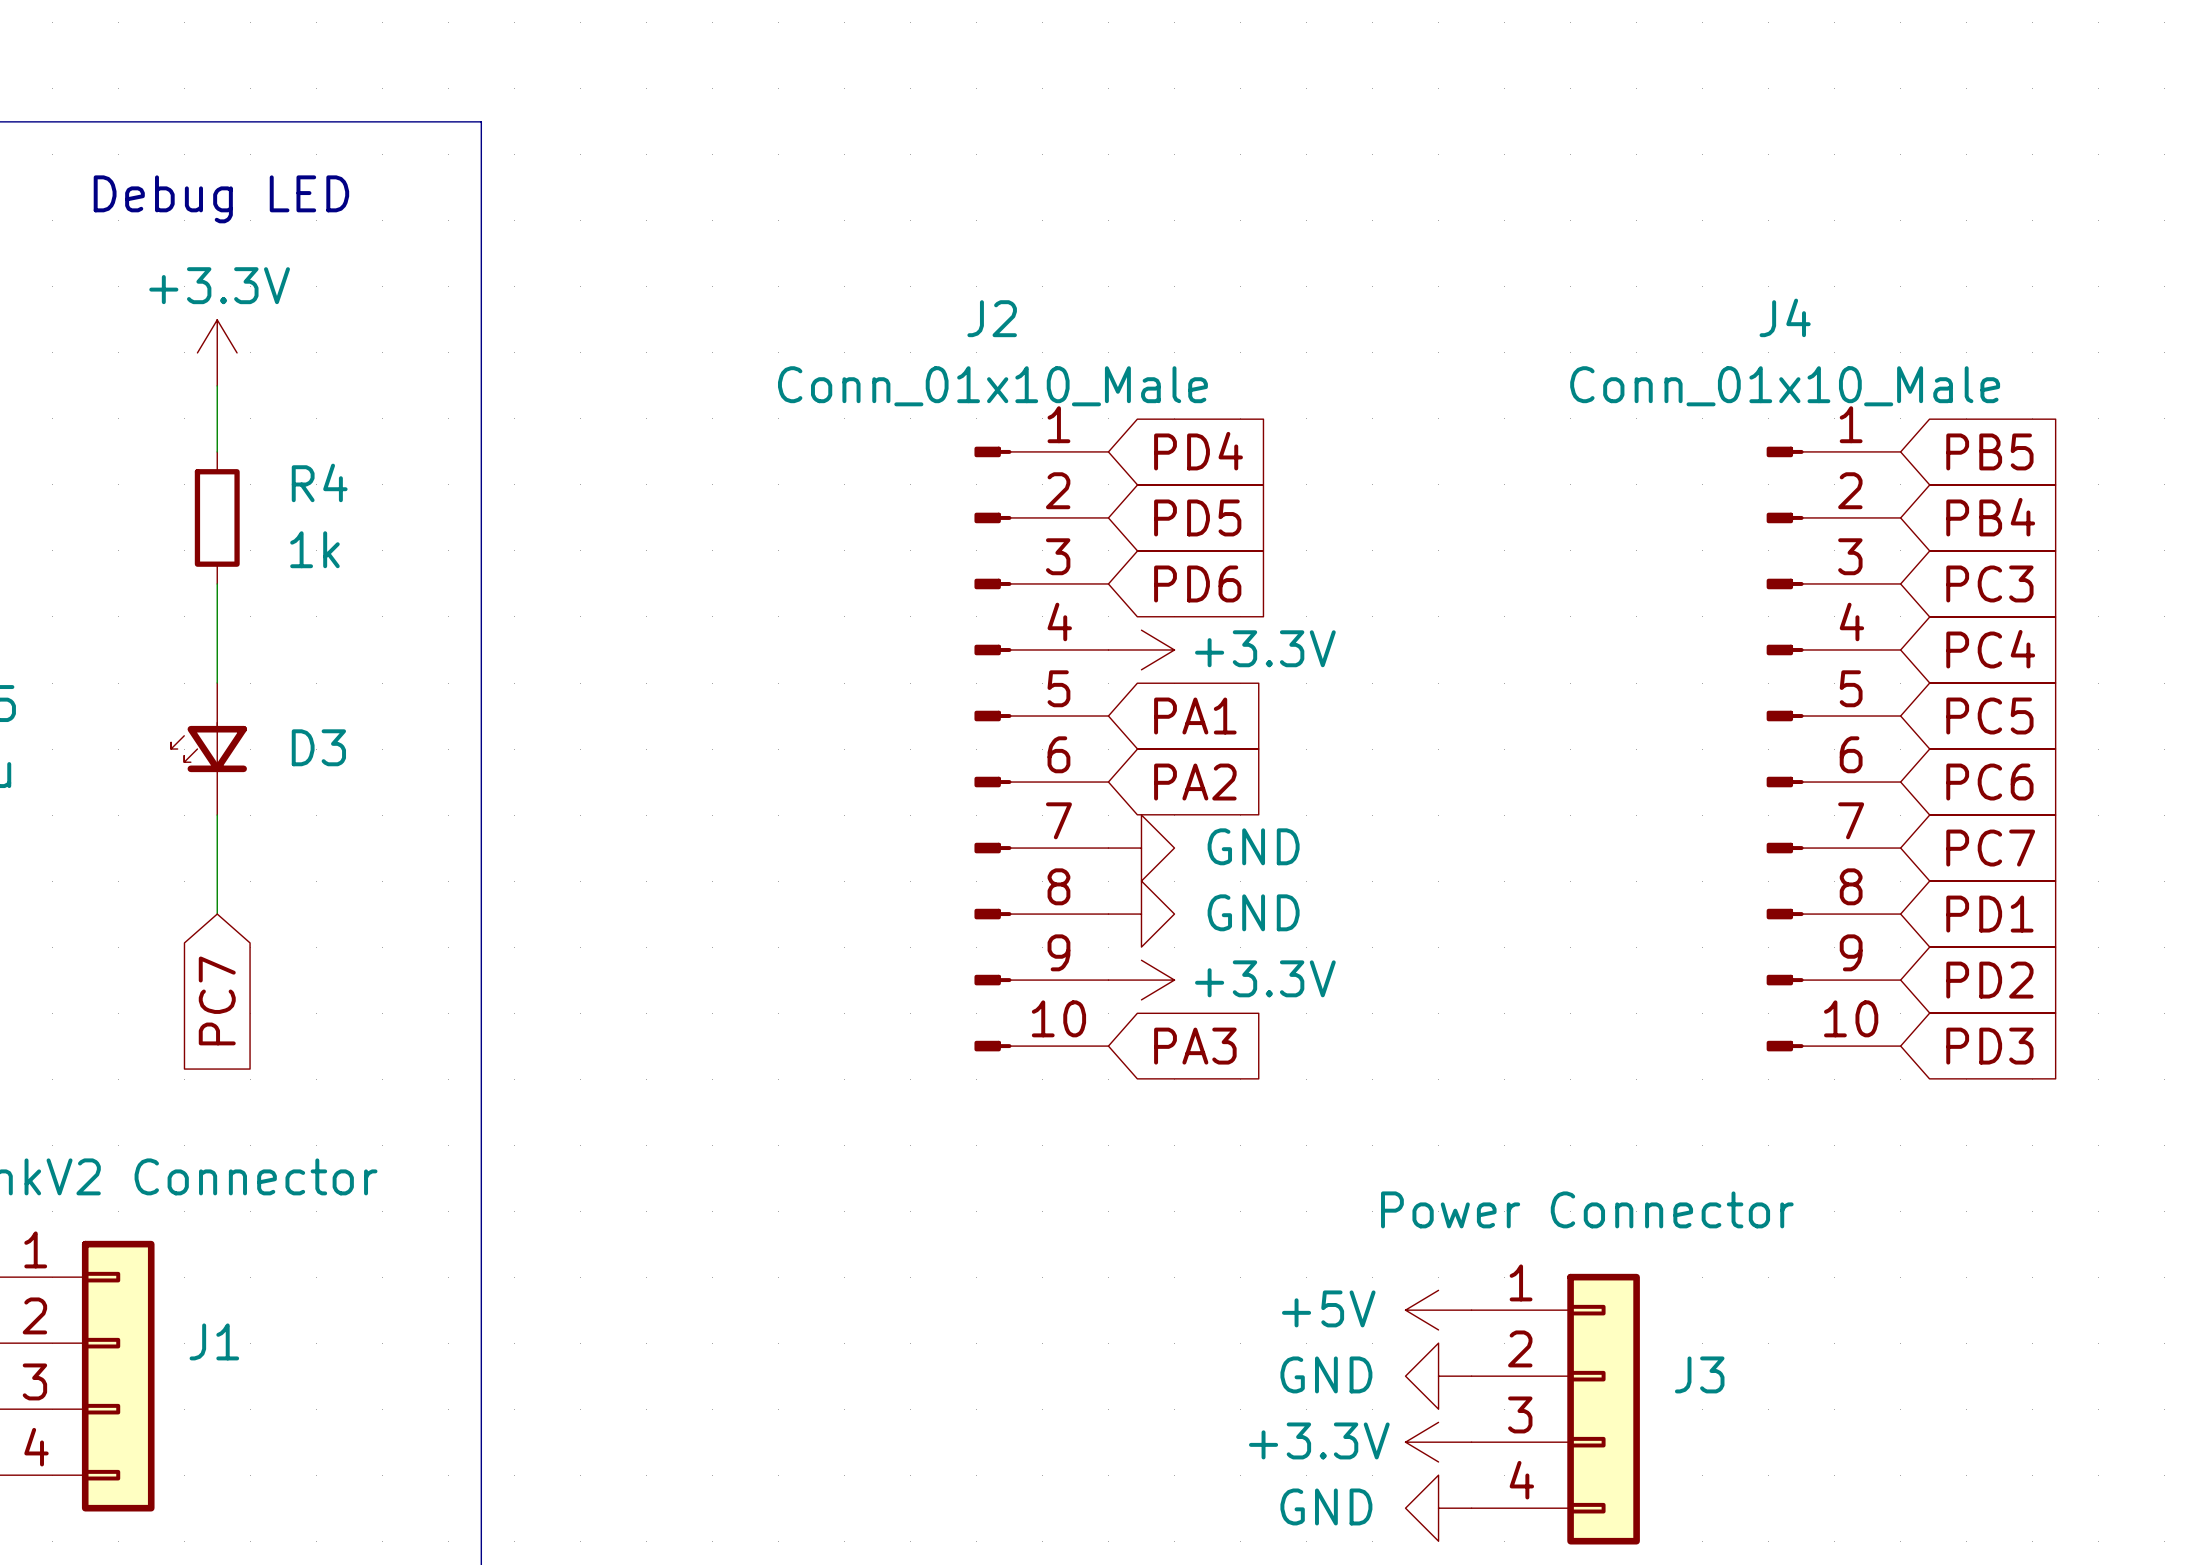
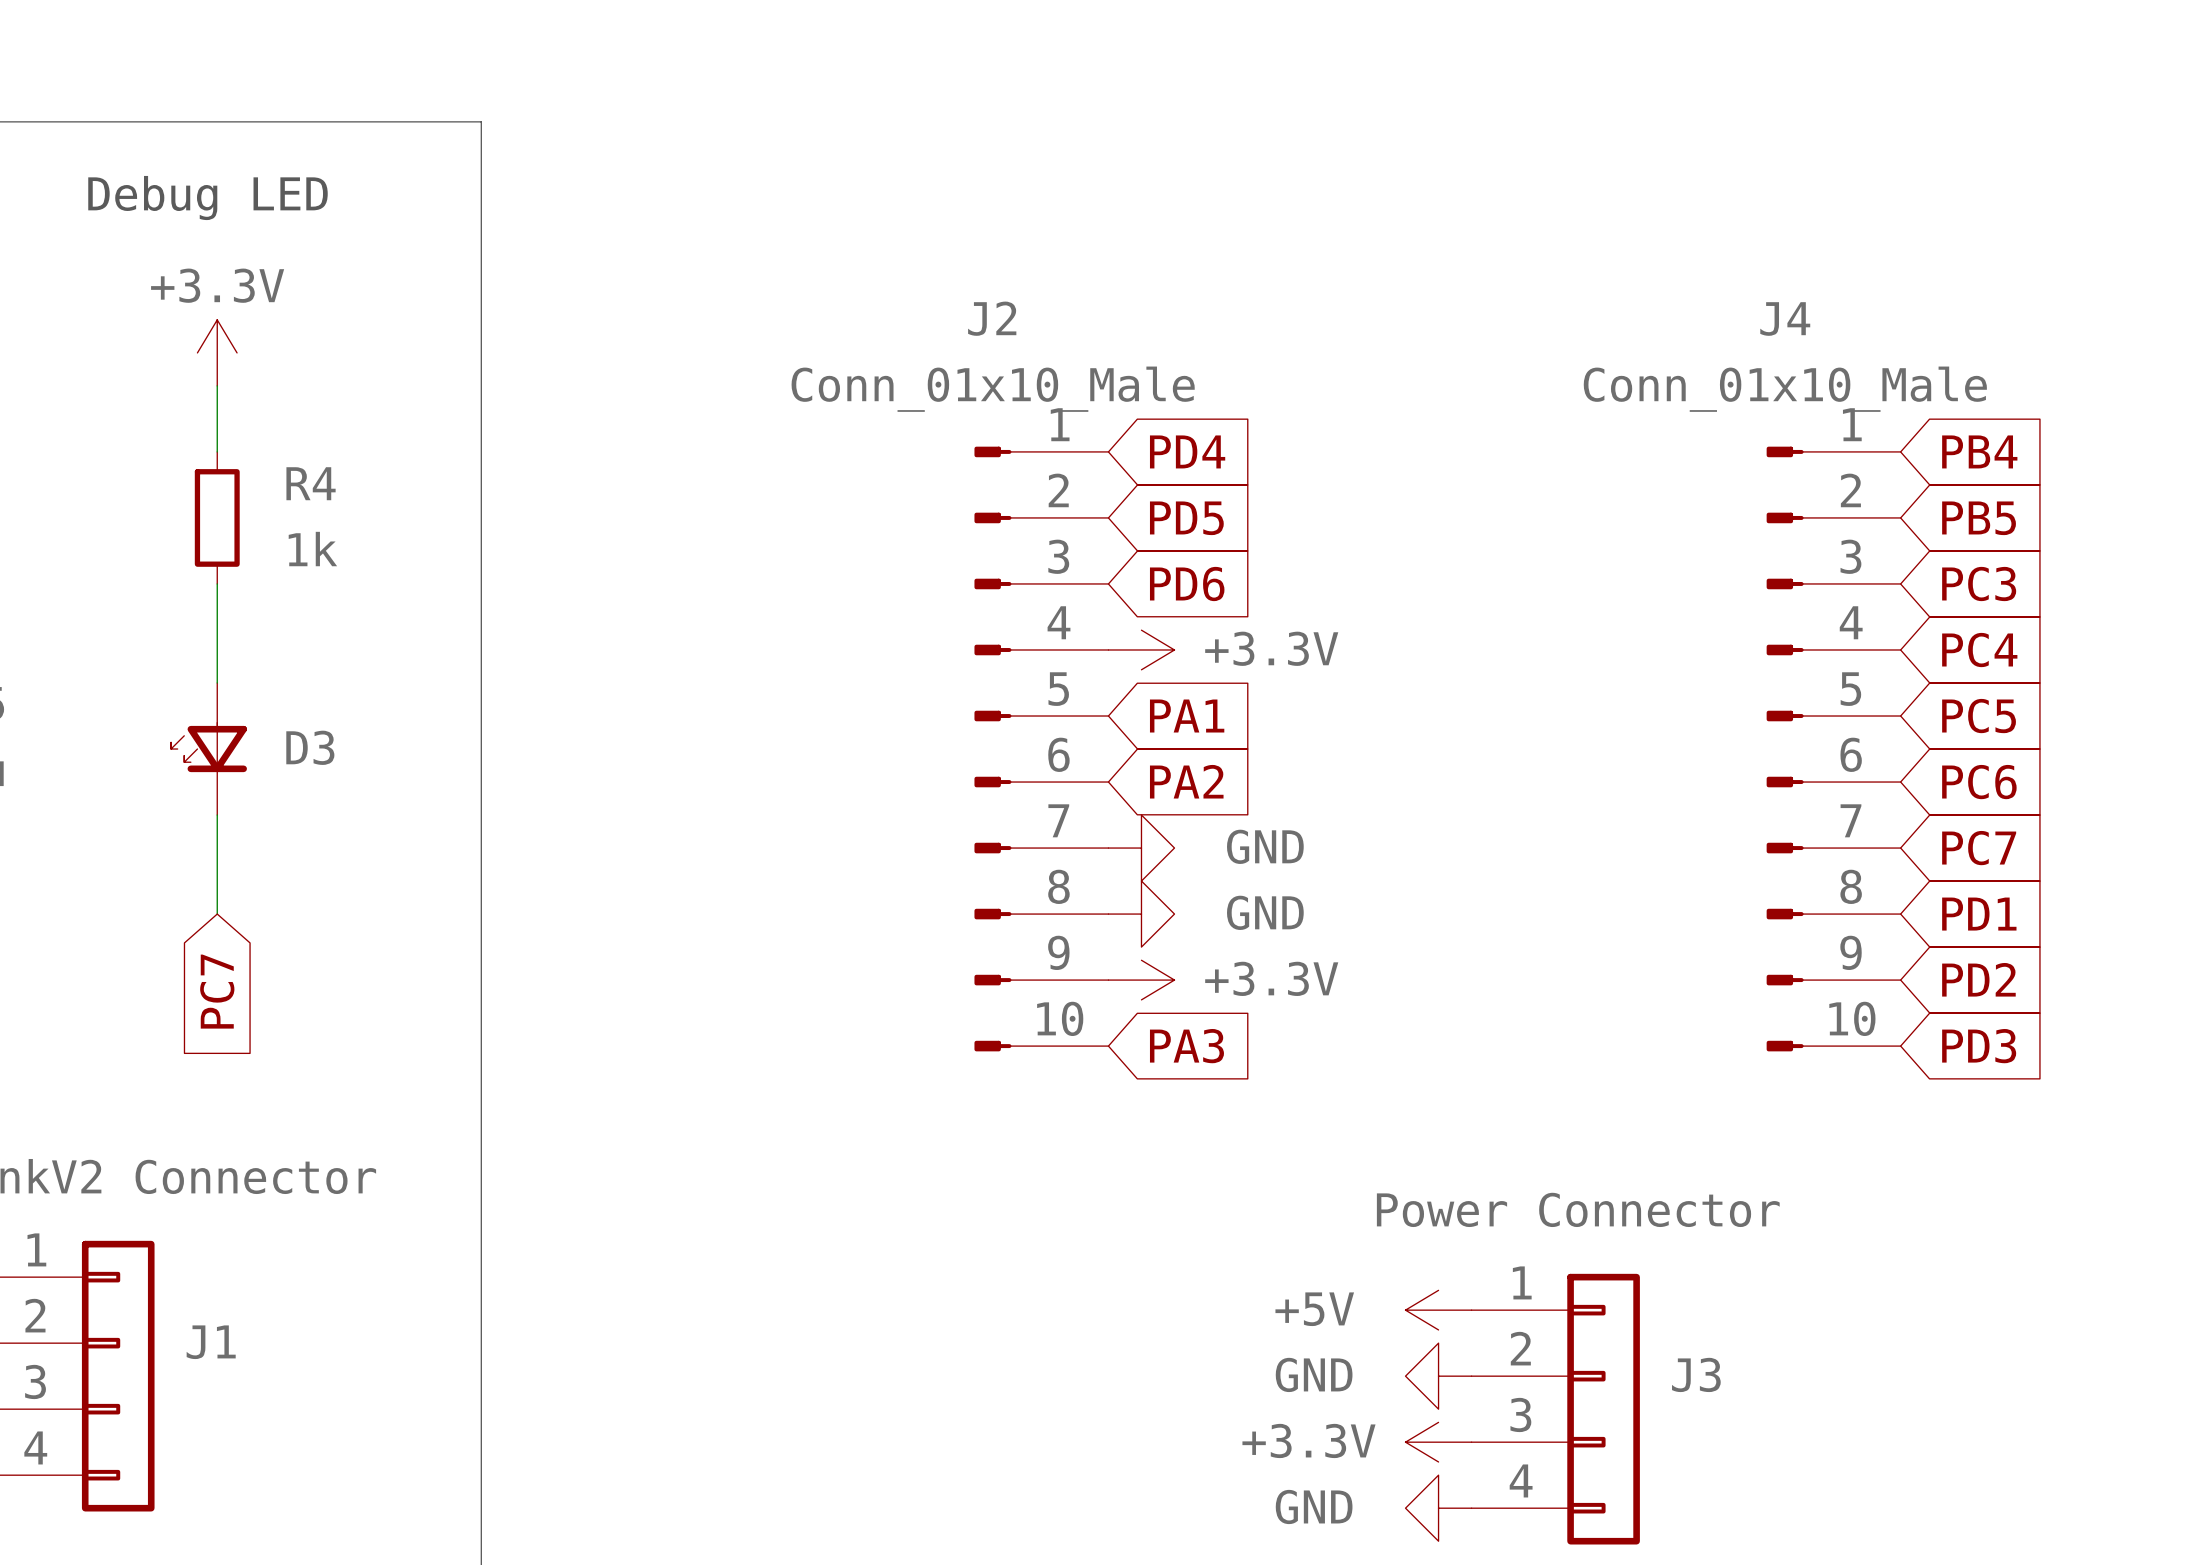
global label: PB5 (1989, 451) -> PB4 (1979, 451)
global label: PB4 (1990, 517) -> PB5 (1979, 518)

